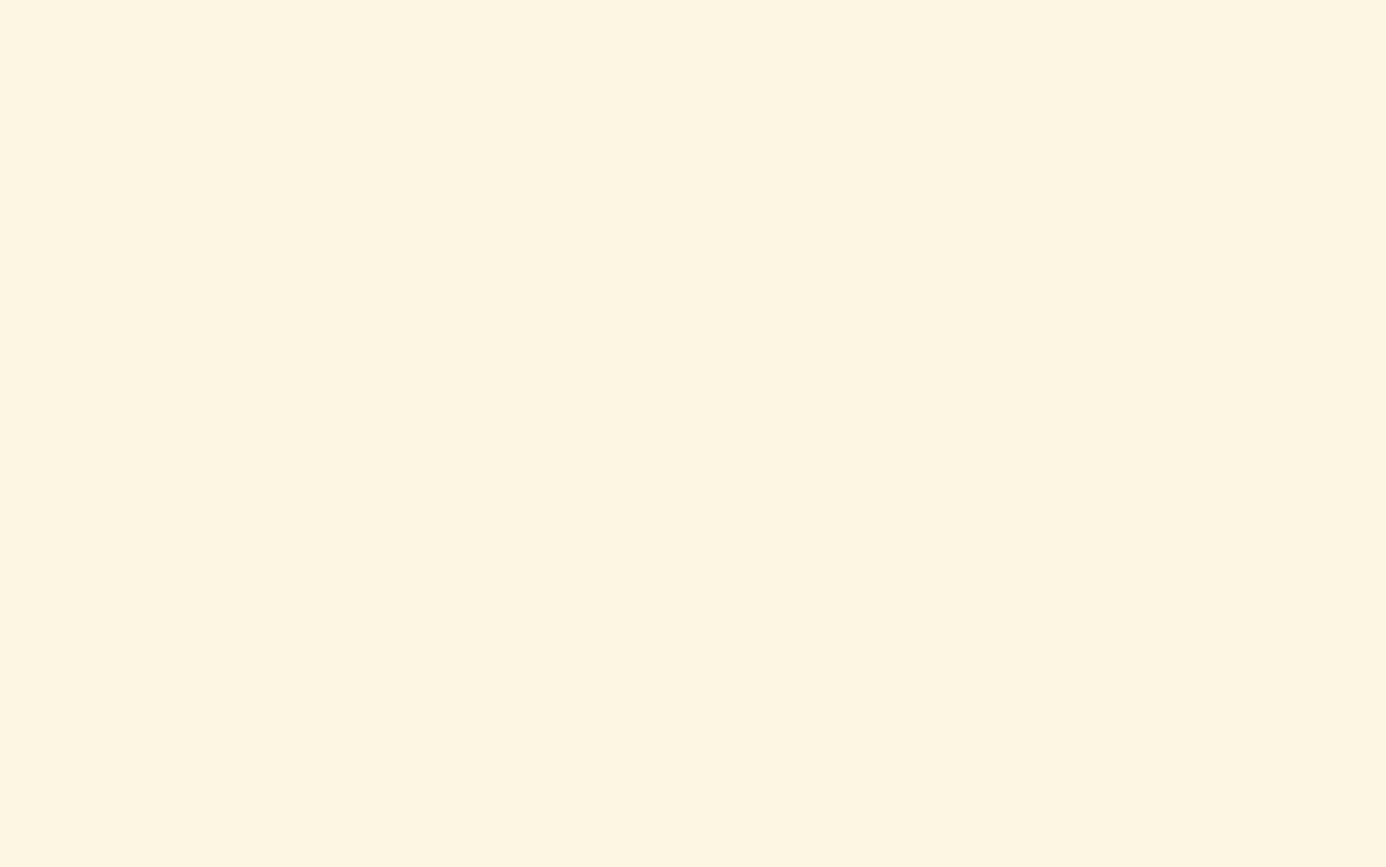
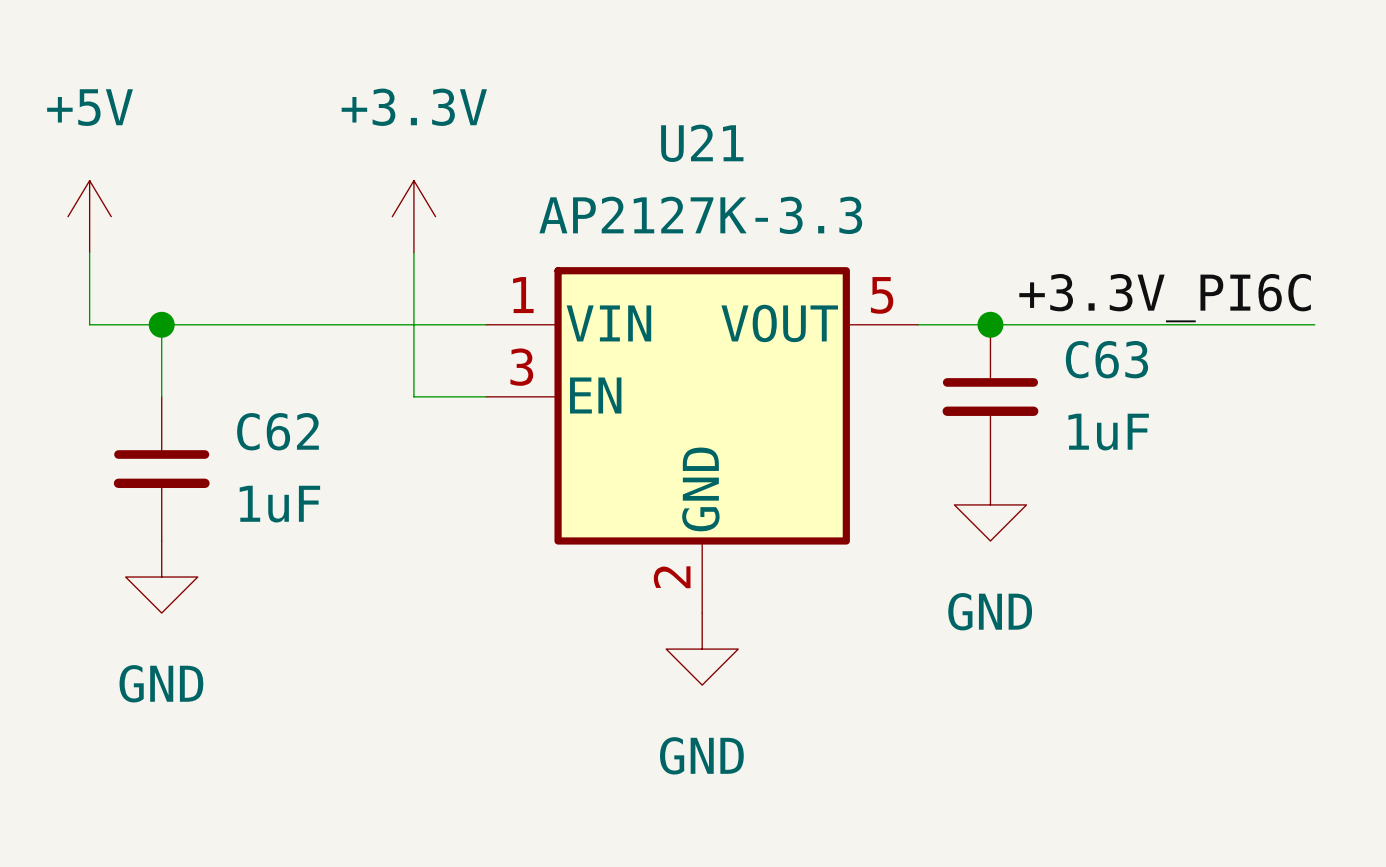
power symbol: none -> +5V (89, 216)
power symbol: none -> +3.3V (413, 216)
wire: none -> (89, 252) (89, 324) (486, 324)
wire: none -> (413, 252) (413, 396) (486, 396)
label: none -> +3.3V_PI6C (1165, 298)
wire: none -> (161, 324) (161, 396)
junction: none -> (161, 324)
wire: none -> (918, 324) (1314, 324)
junction: none -> (990, 324)
C63: none -> 1uF (990, 396)
U21: none -> AP2127K-3.3 (702, 440)
C62: none -> 1uF (161, 468)
power symbol: none -> GND (990, 504)
power symbol: none -> GND (161, 577)
power symbol: none -> GND (702, 649)

